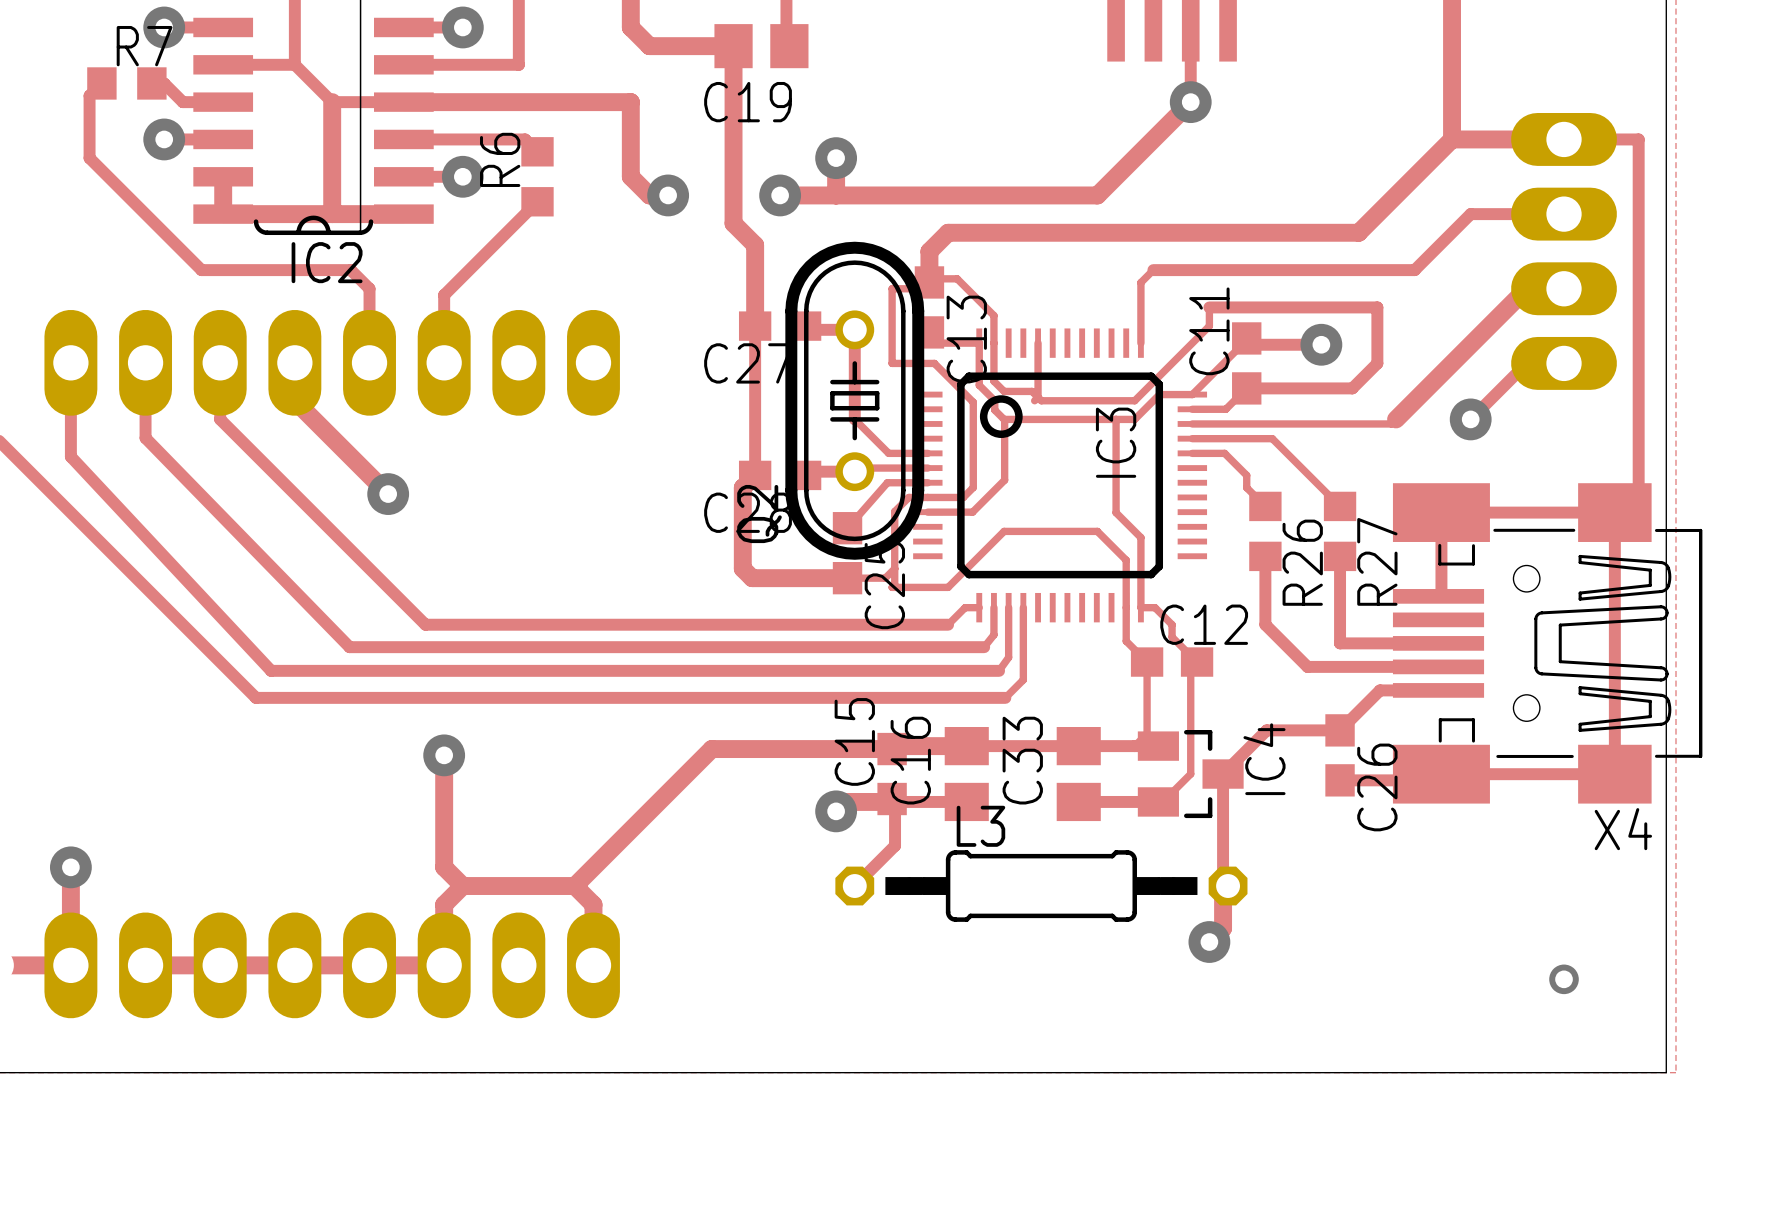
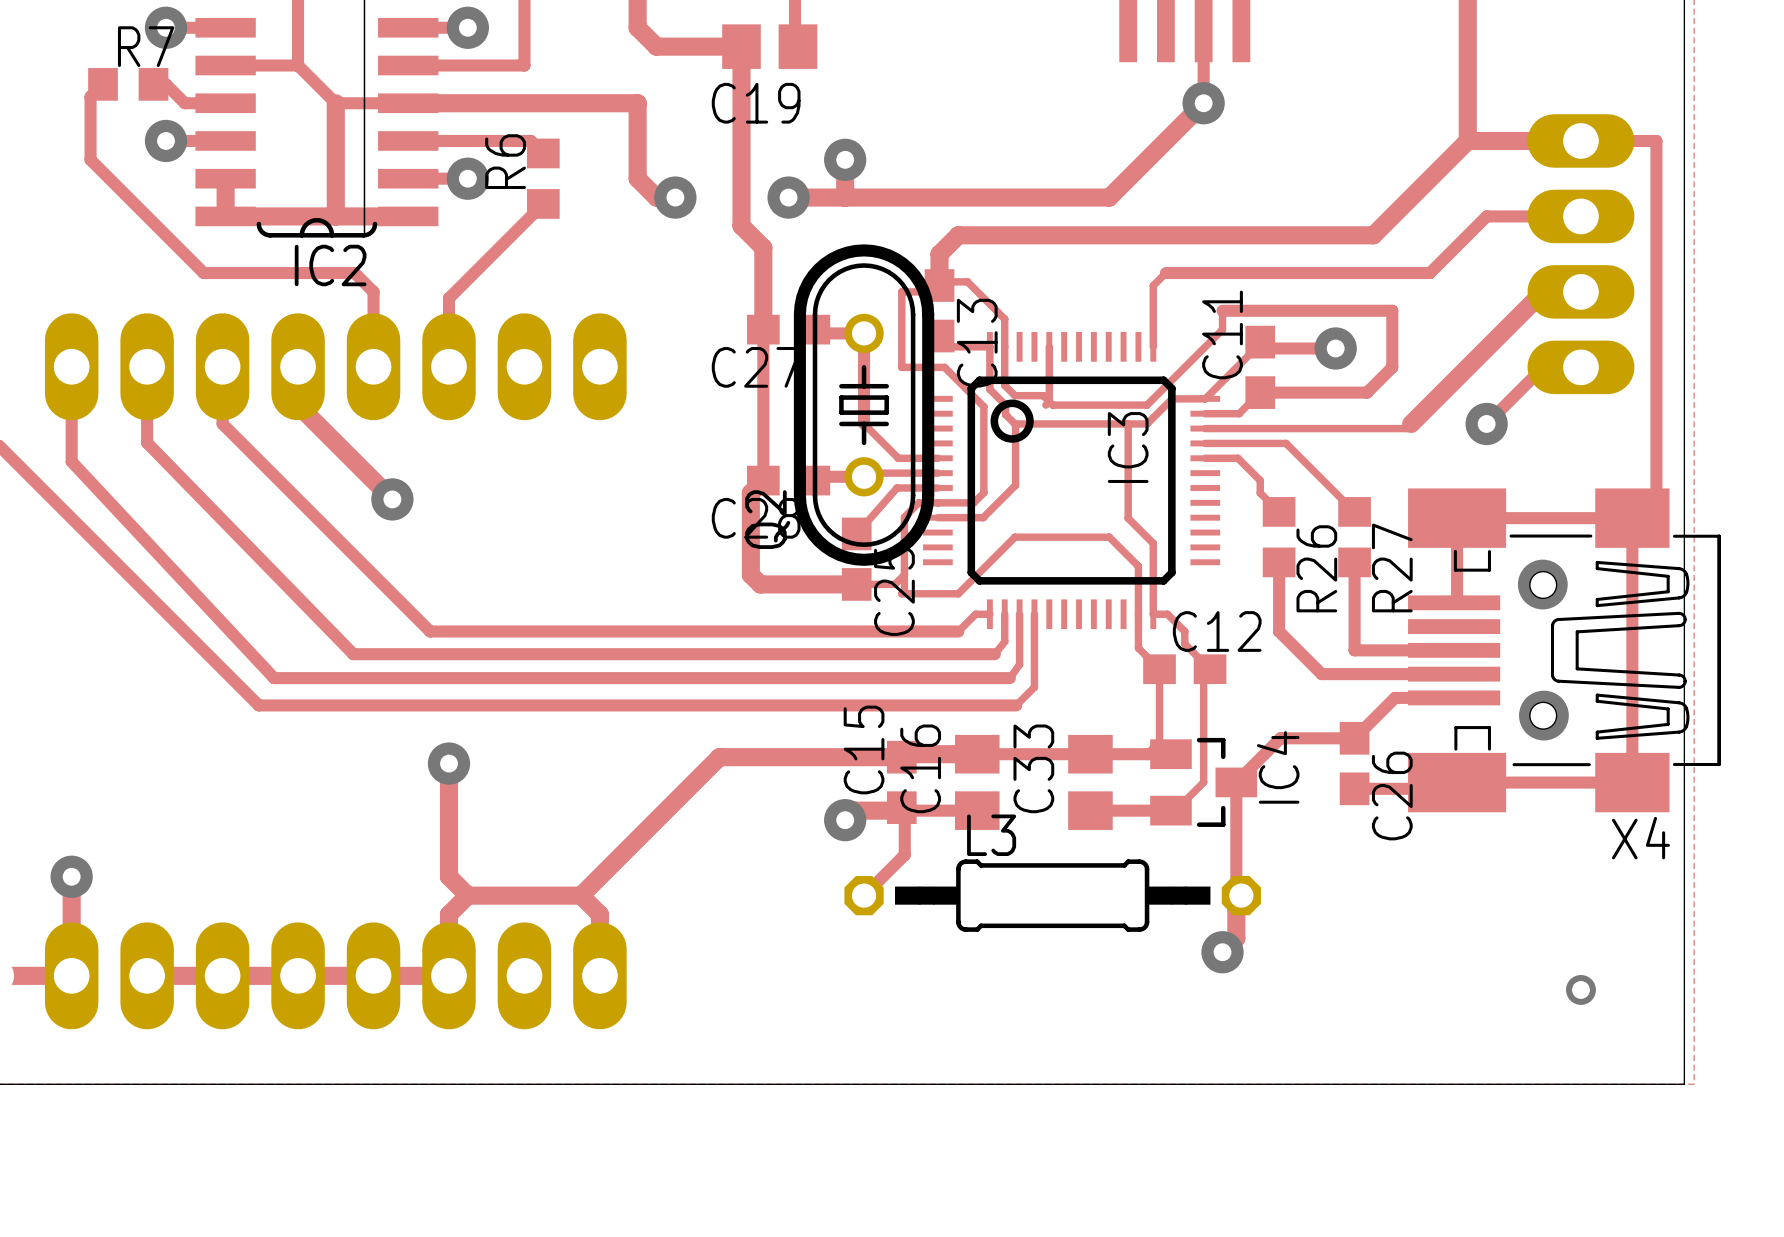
via: none -> (1542, 584)
via: none -> (1543, 715)

